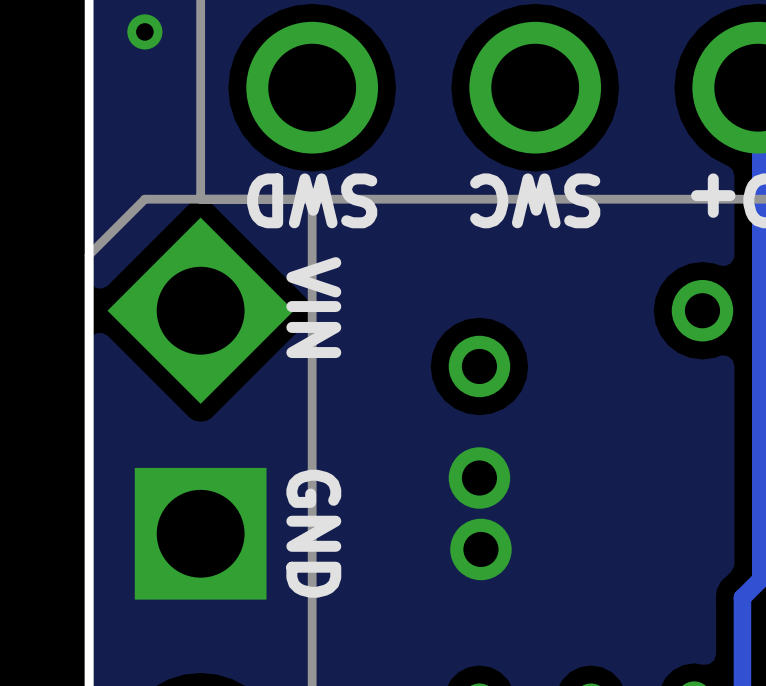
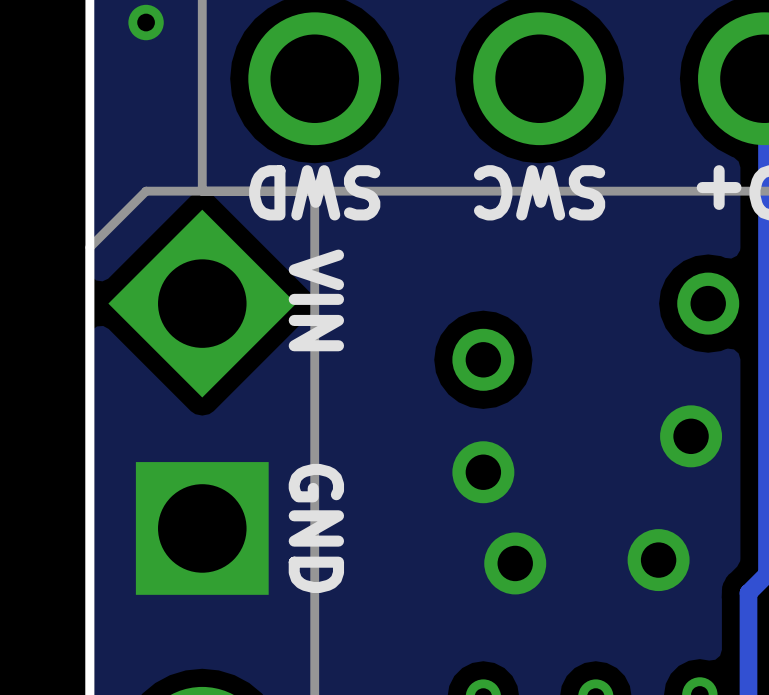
via: none -> (691, 436)
via position: (480, 549) -> (515, 563)
via: none -> (658, 560)

